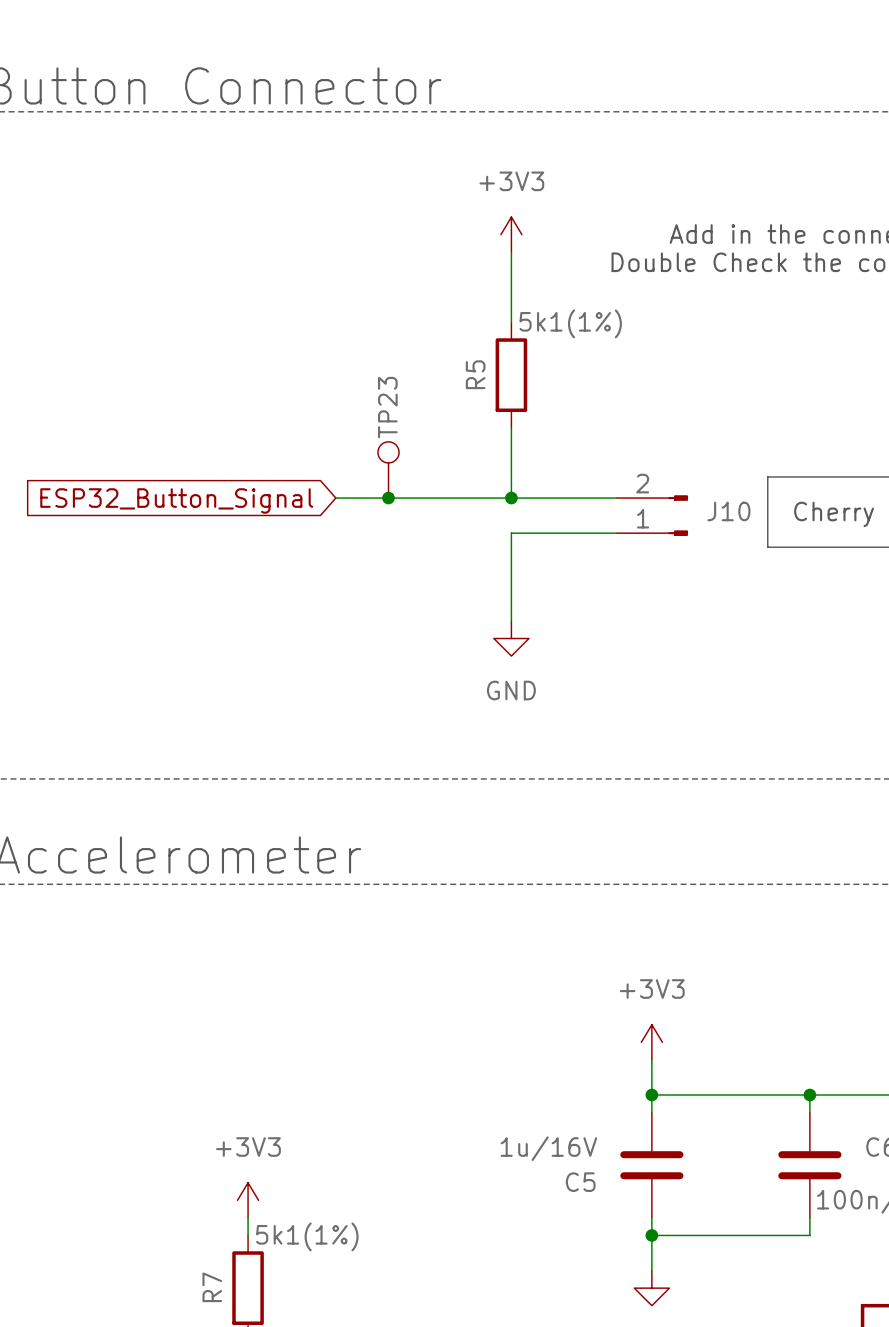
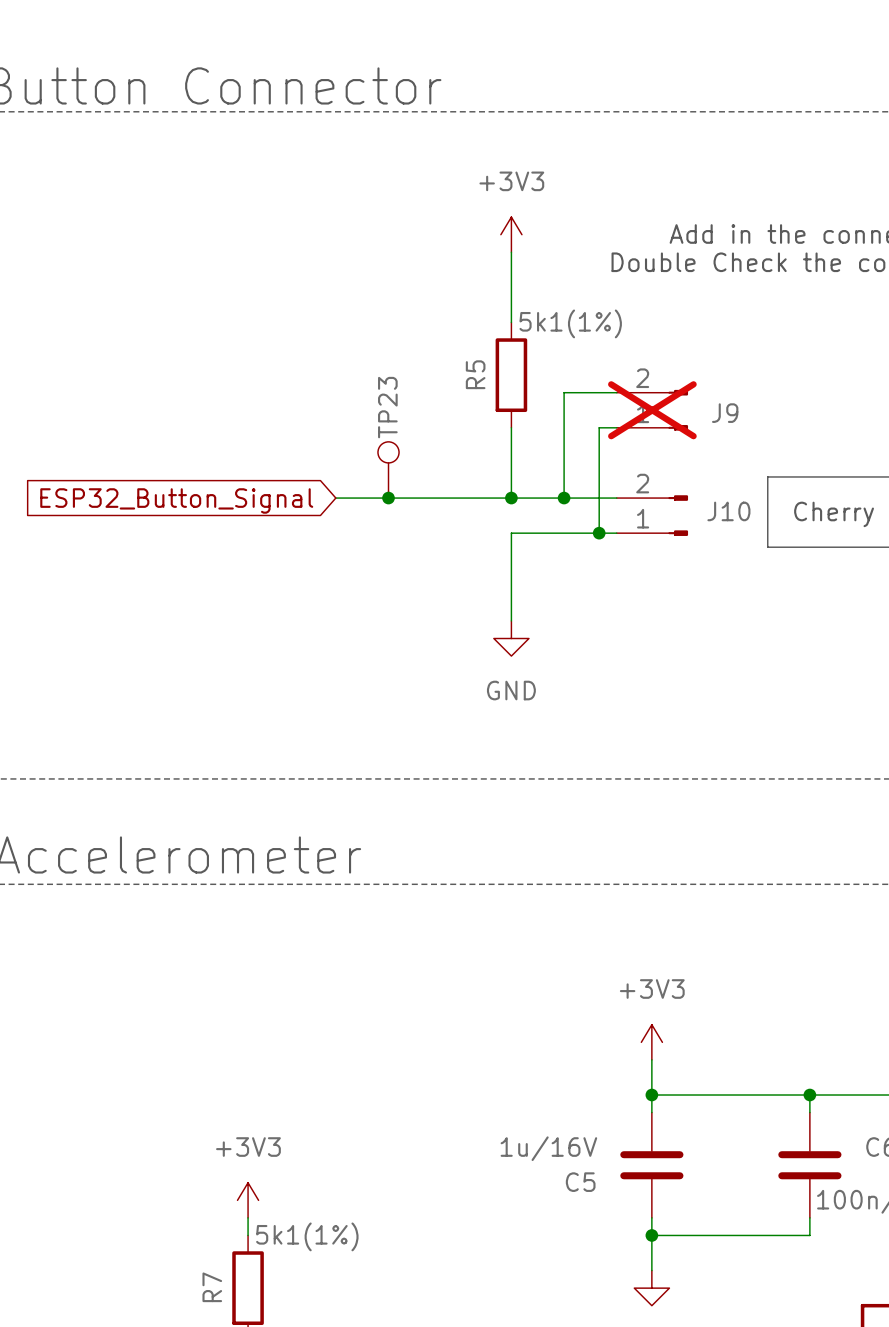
wire: none -> (616, 392) (564, 392) (564, 498)
J9: none -> (652, 410)
wire: none -> (616, 427) (599, 427) (599, 533)
junction: none -> (564, 498)
junction: none -> (599, 533)

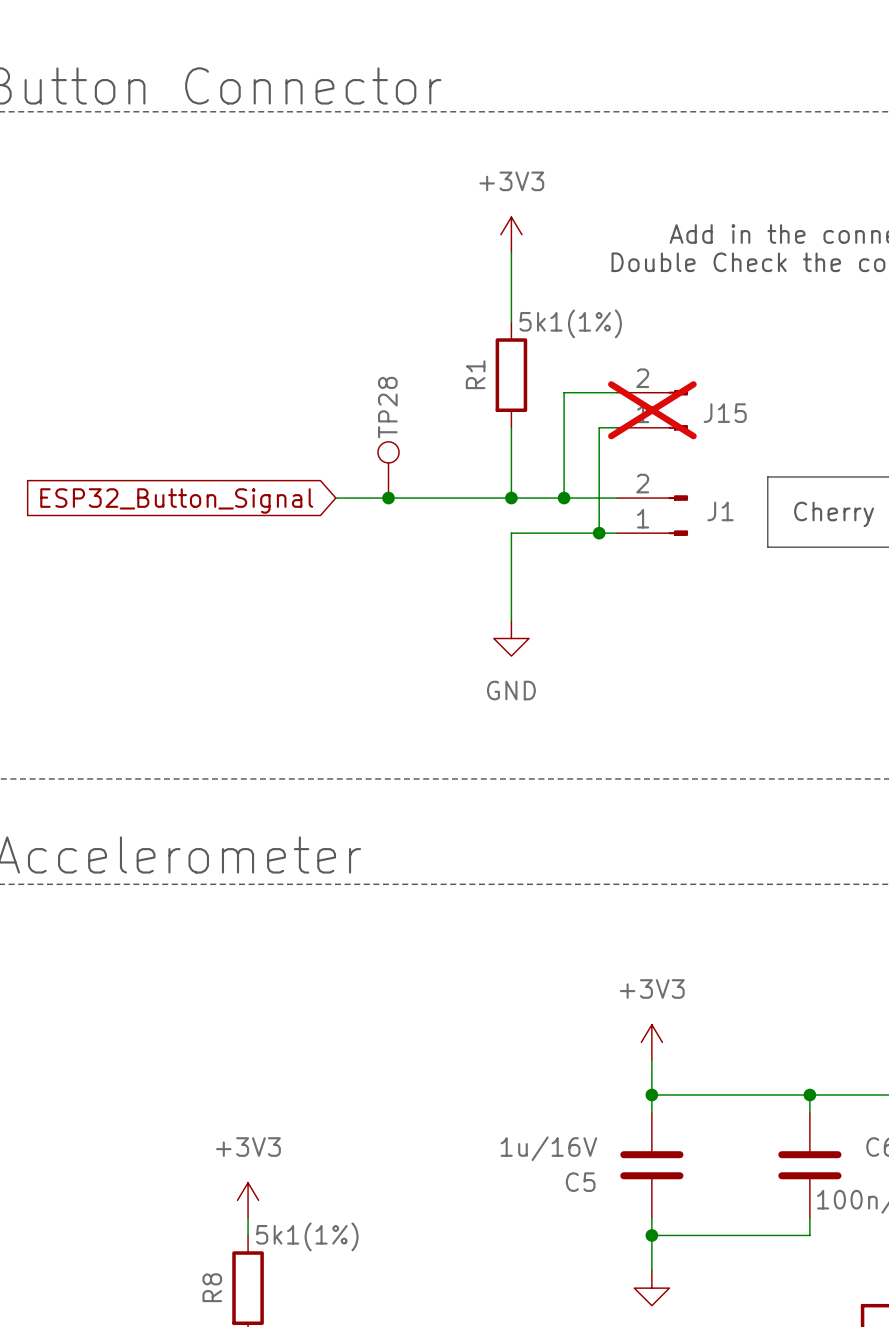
R5 name: R5 (475, 374) -> R1 (475, 374)
TP23 name: TP23 (387, 407) -> TP28 (387, 407)
J9 name: J9 (725, 413) -> J15 (725, 413)
J10 name: J10 (728, 511) -> J1 (720, 511)
R7 name: R7 (212, 1287) -> R8 (212, 1287)

